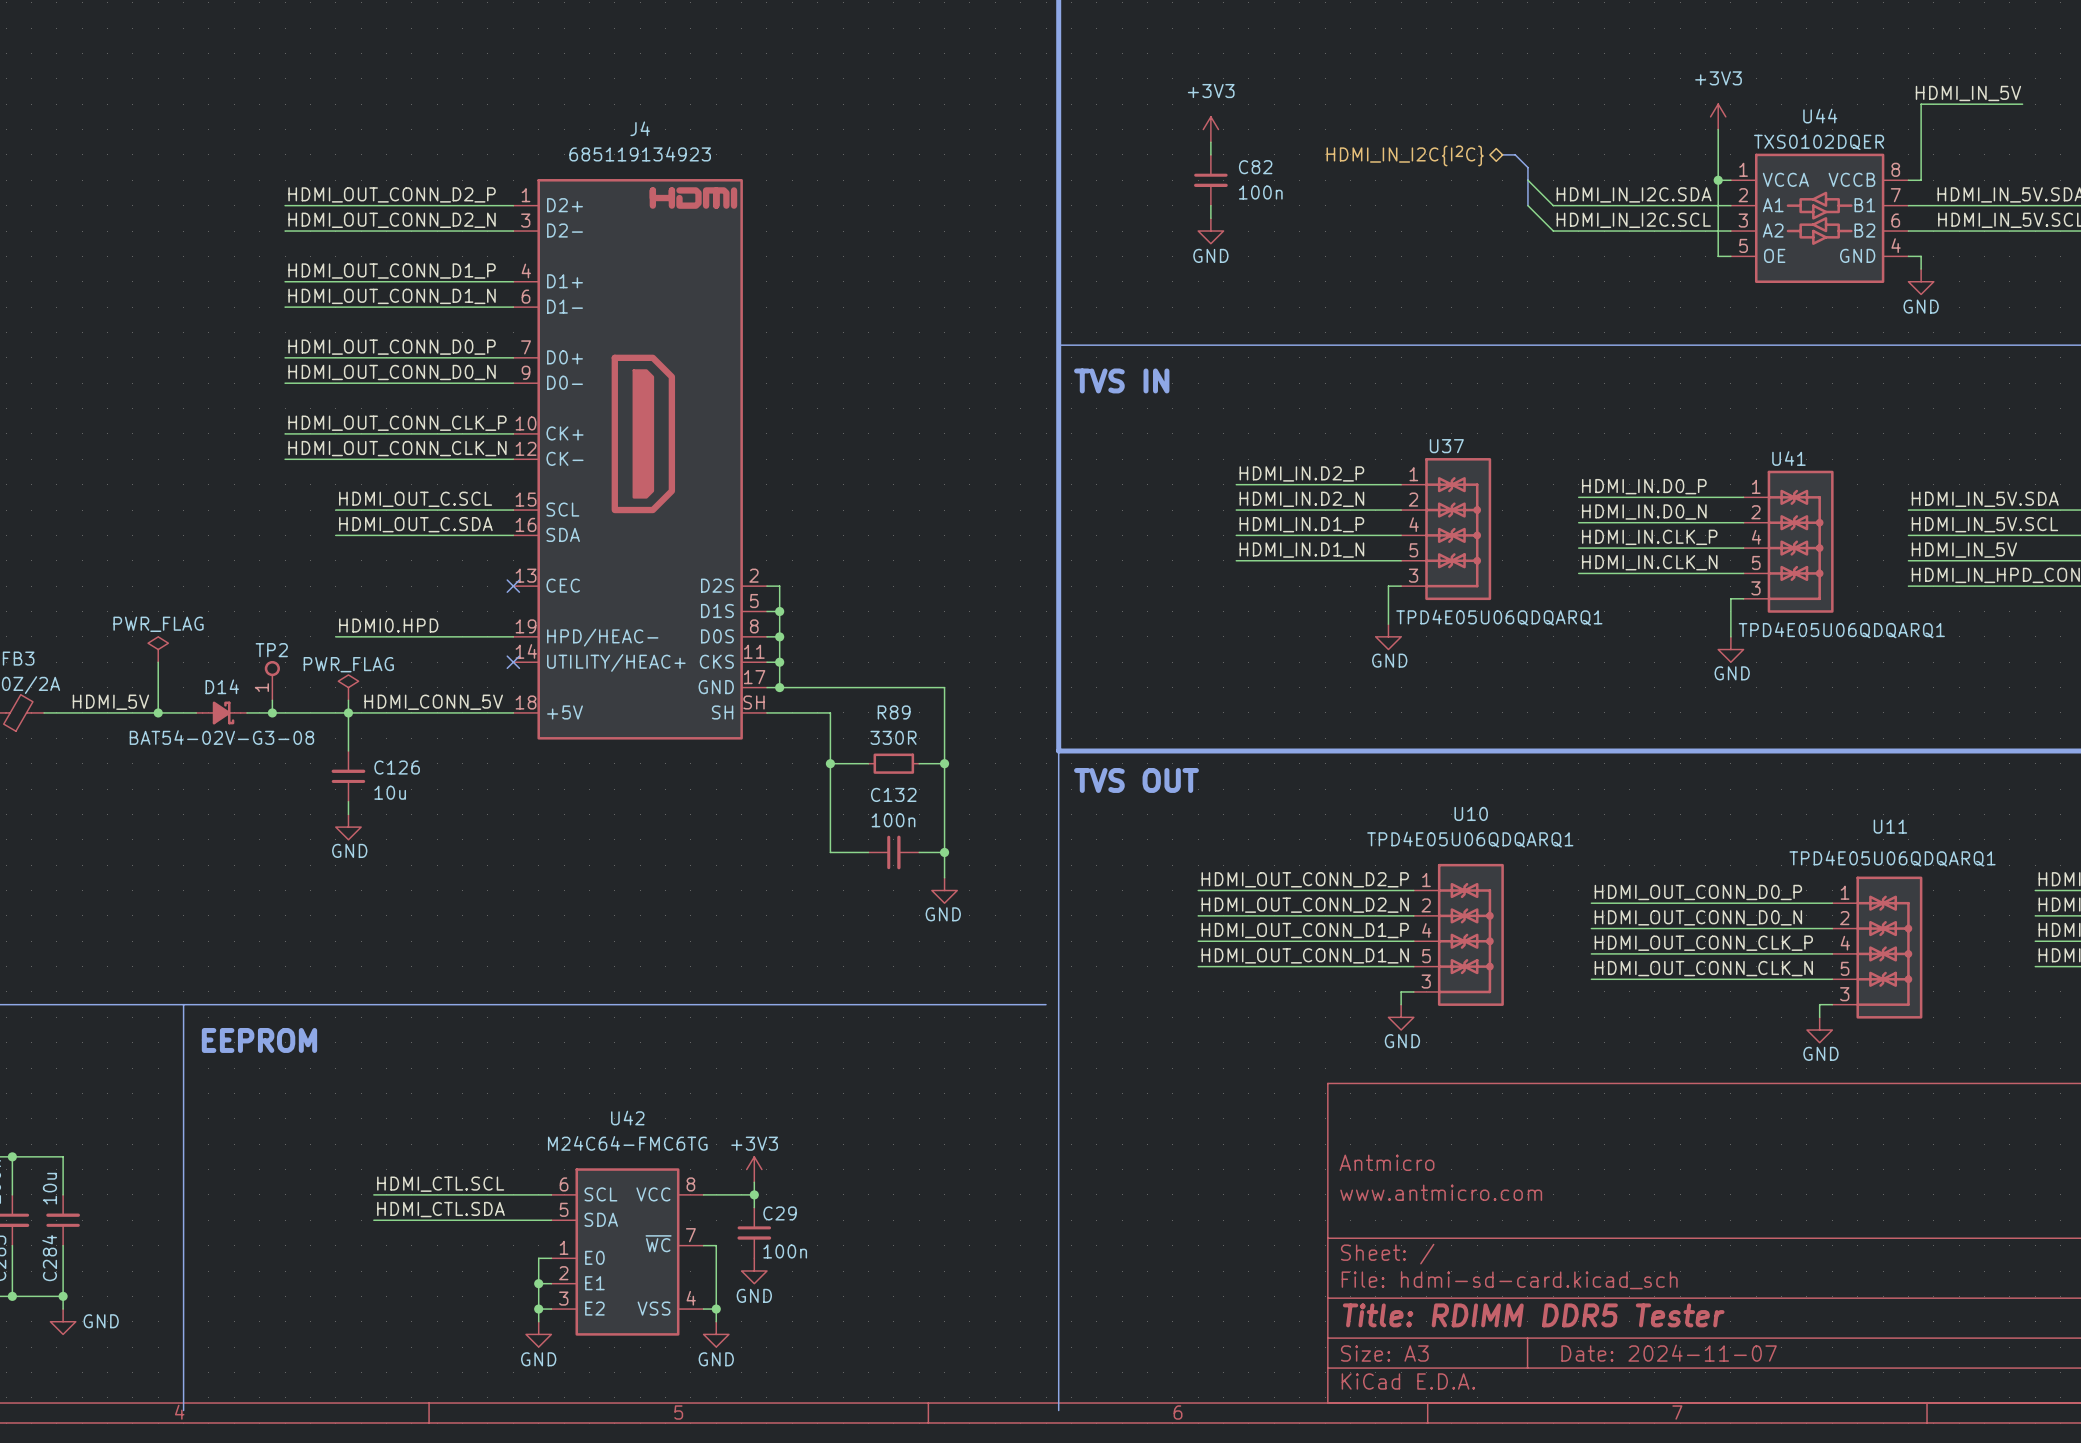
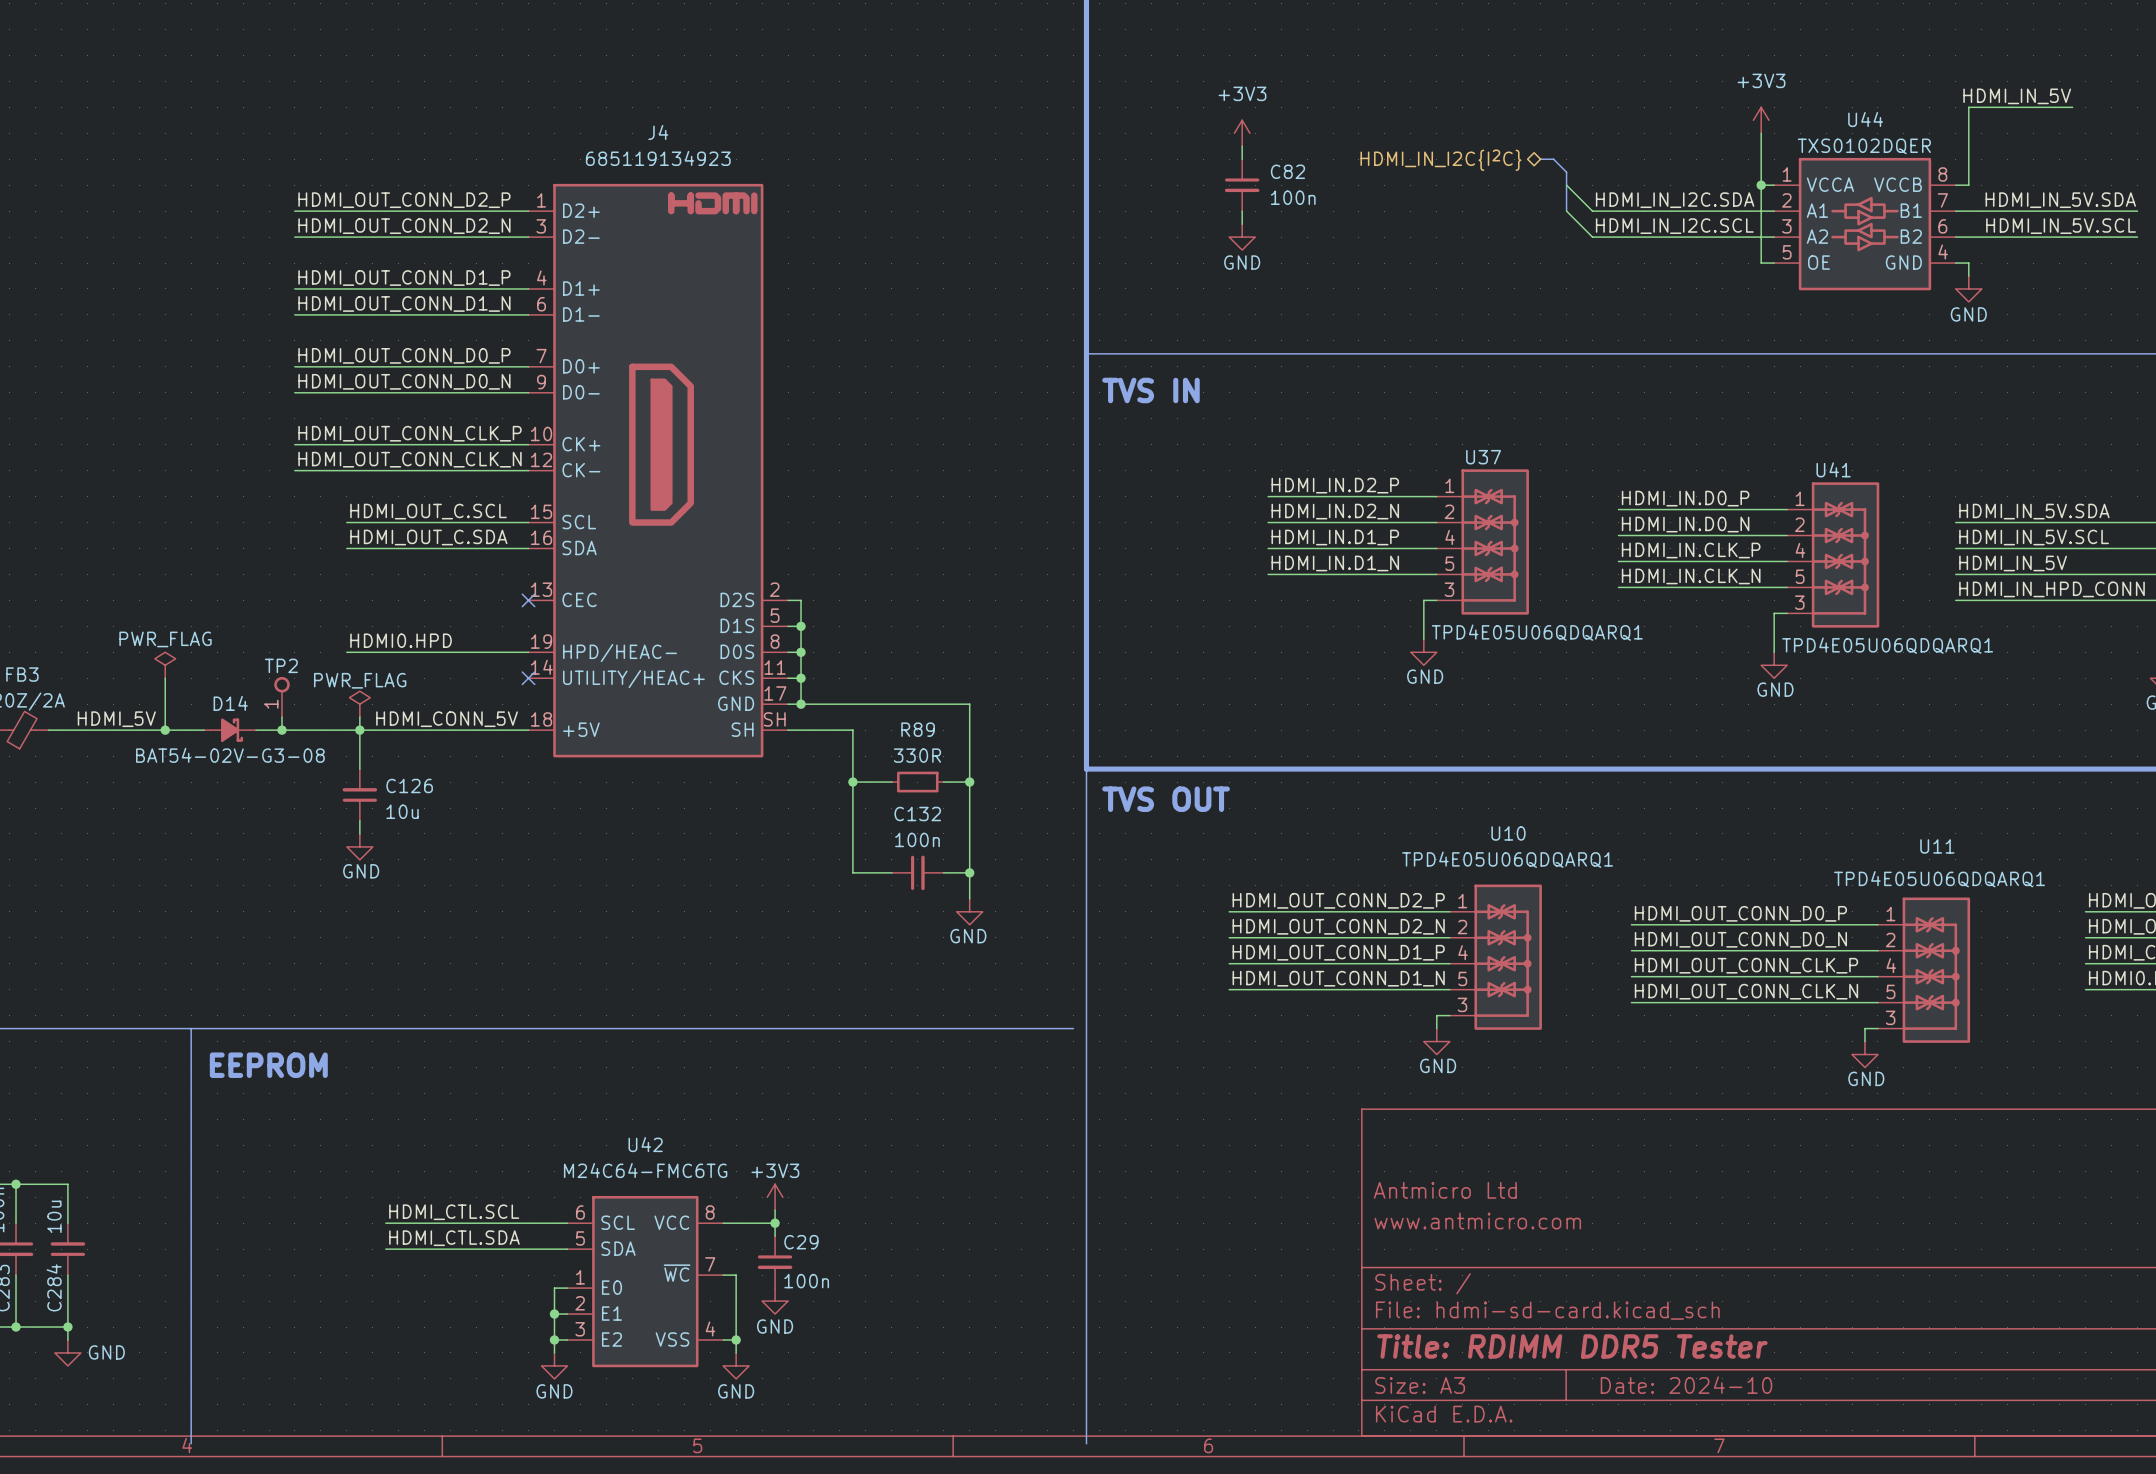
title block: Antmicro (1386, 1162) -> Antmicro Ltd (1445, 1190)
title block: Date: 2024-11-07 (1669, 1353) -> Date: 2024-10 (1686, 1385)

